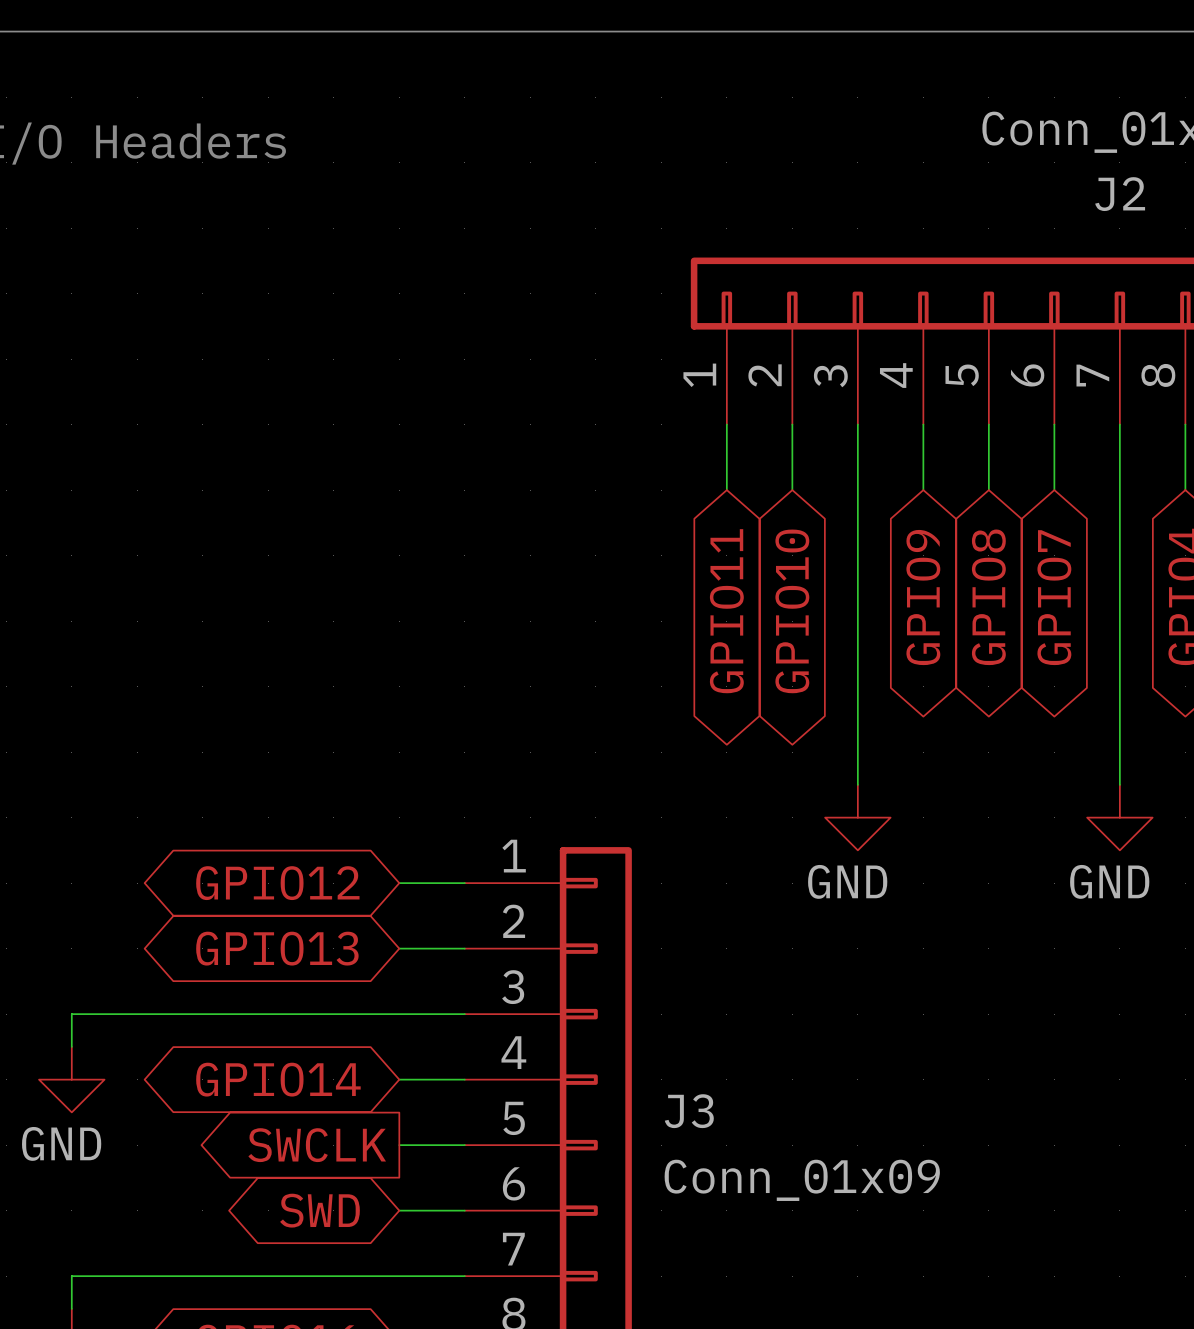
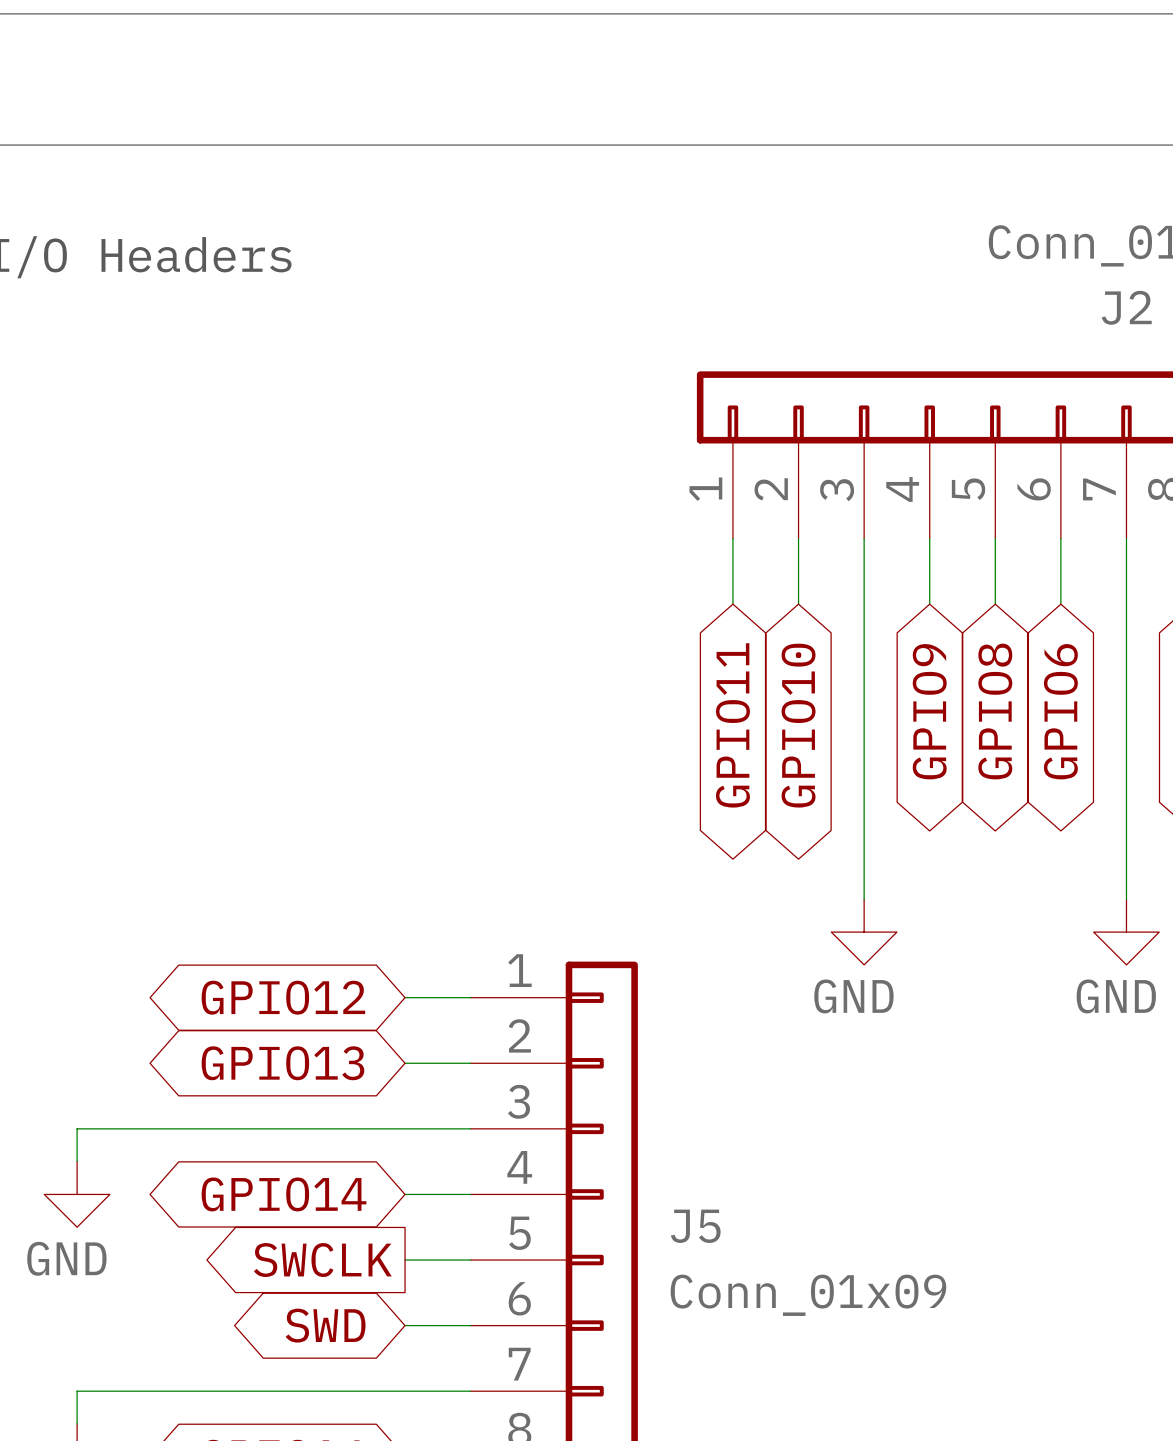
global label: GPIO7 (1054, 597) -> GPIO6 (1060, 711)
J3 name: J3 (689, 1111) -> J5 (695, 1226)

